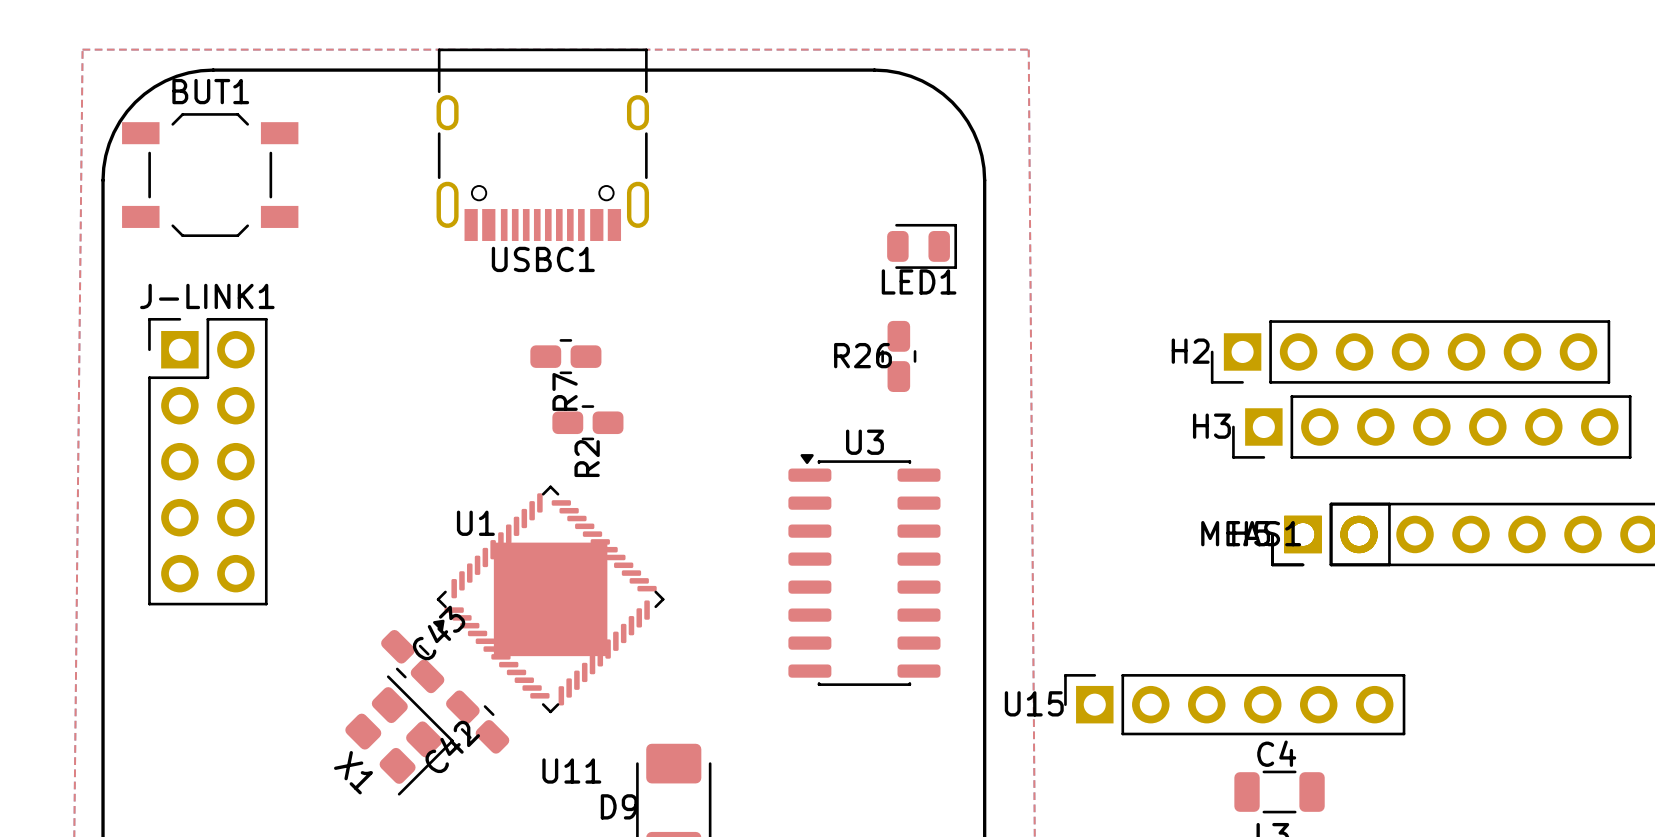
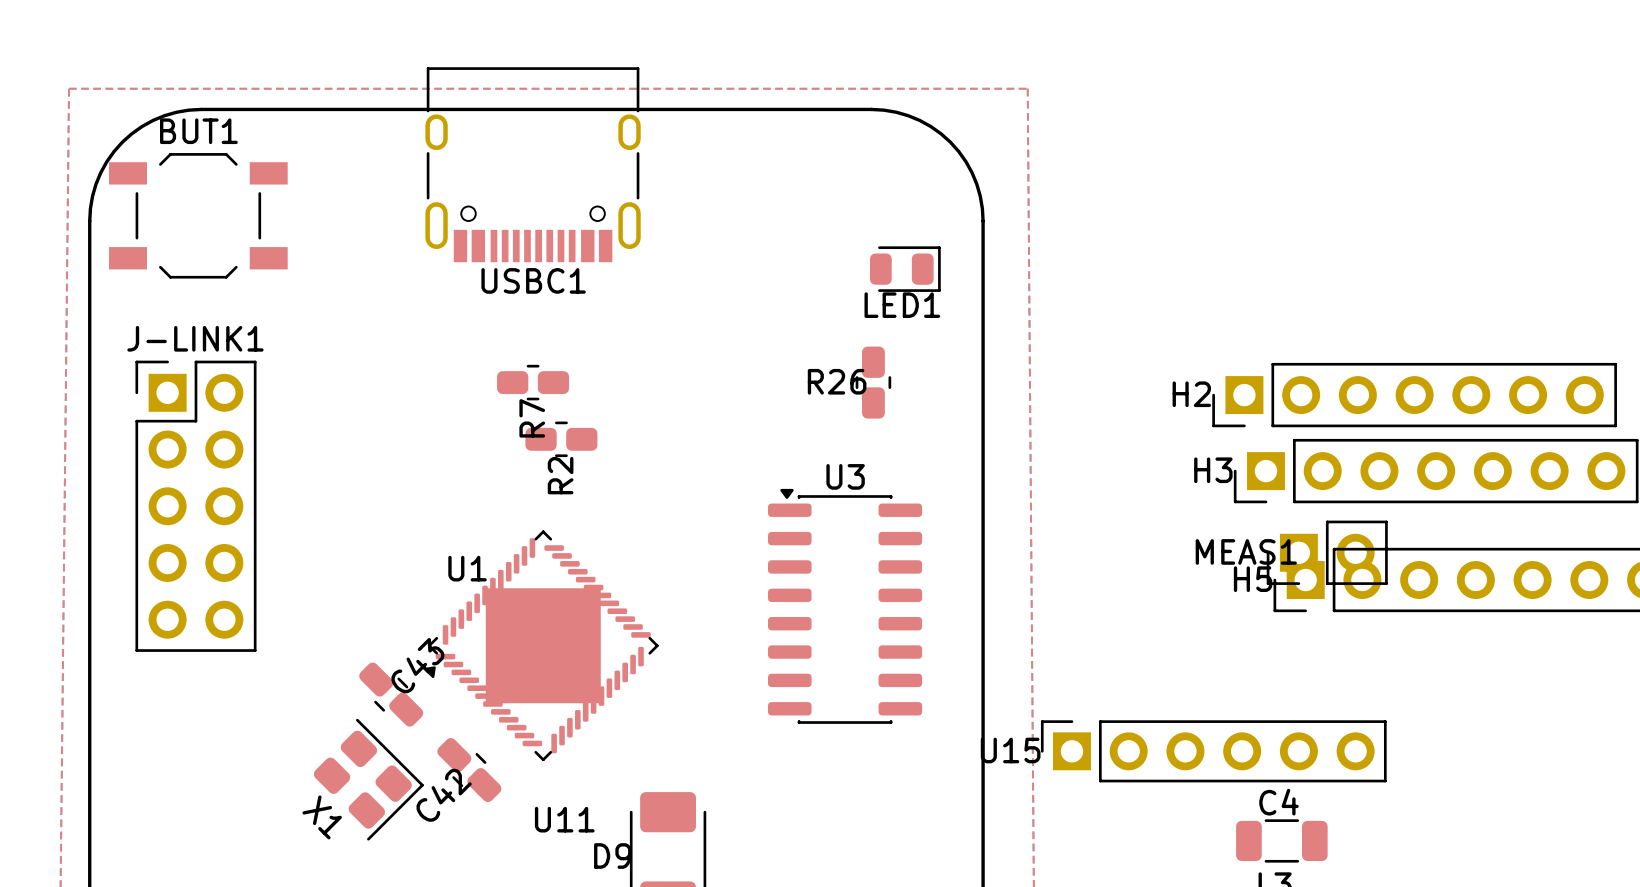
USBC1 position: (542, 144) -> (533, 164)
LED1 position: (922, 246) -> (905, 269)
R7 position: (565, 356) -> (533, 382)
R26 position: (898, 356) -> (873, 382)
R2 position: (587, 422) -> (561, 439)
MEAS1 position: (1331, 534) -> (1327, 552)
U3 position: (864, 570) -> (845, 606)
C43 position: (412, 661) -> (391, 694)
U15 position: (1234, 704) -> (1213, 751)
X1 position: (399, 735) -> (368, 779)

